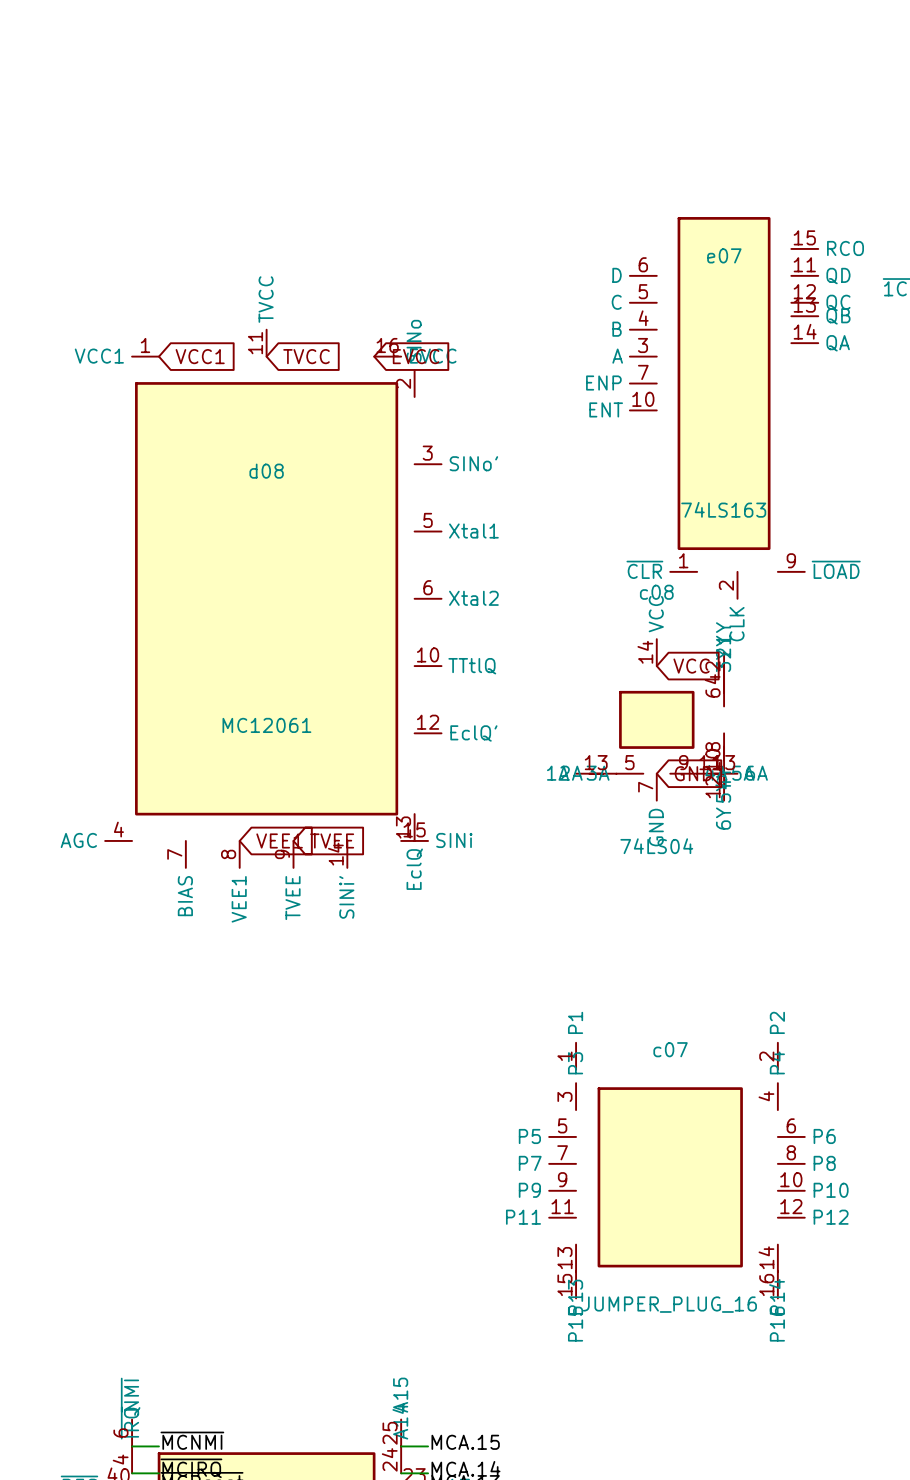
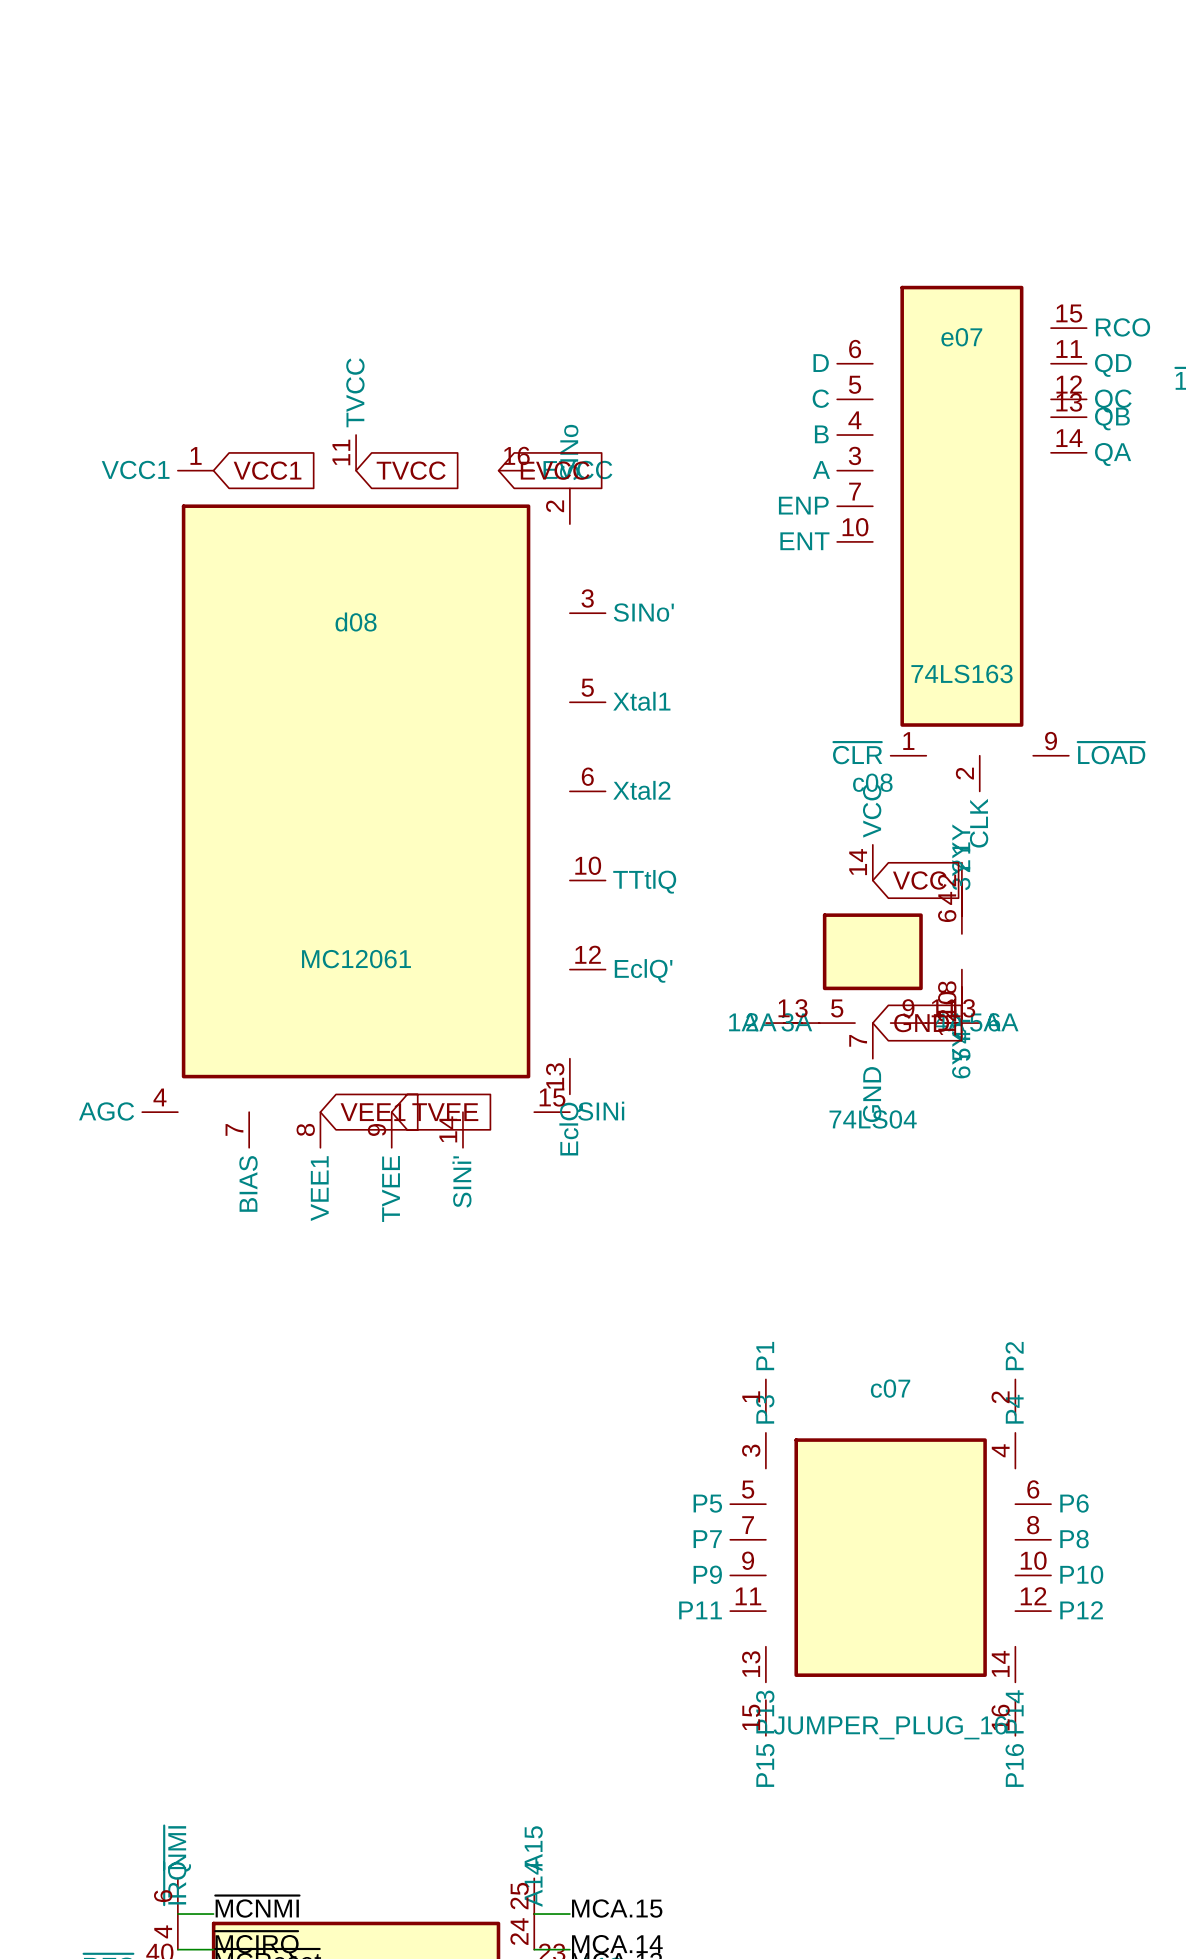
d08 symbol: [105, 329, 442, 868] -> [142, 435, 606, 1148]
c08 symbol: [576, 639, 738, 801] -> [765, 844, 980, 1059]
c07 symbol: [549, 1042, 805, 1299] -> [730, 1379, 1052, 1736]

